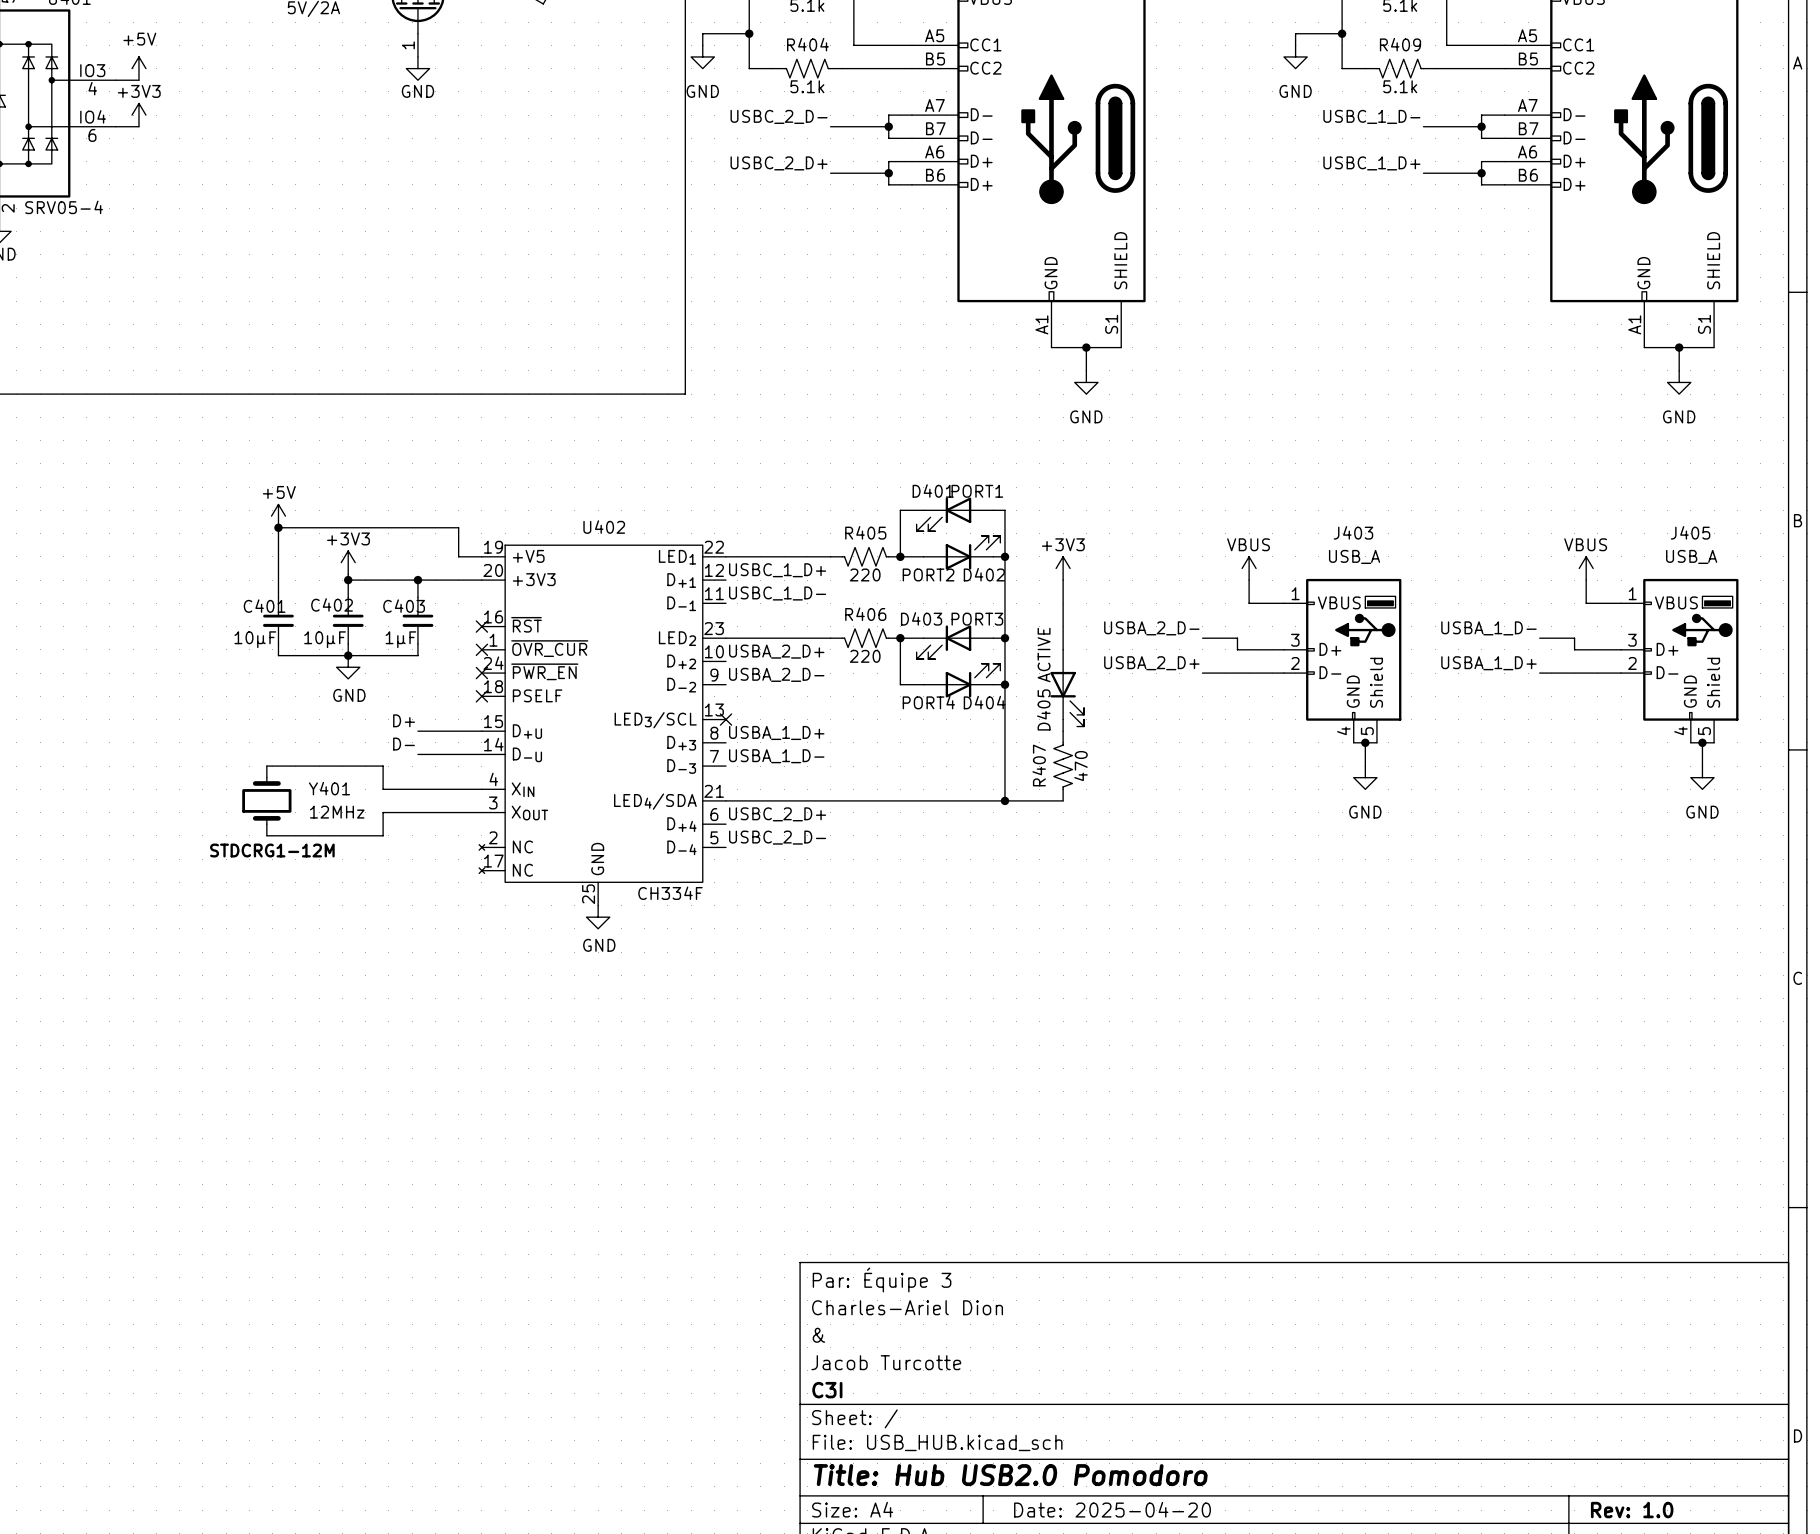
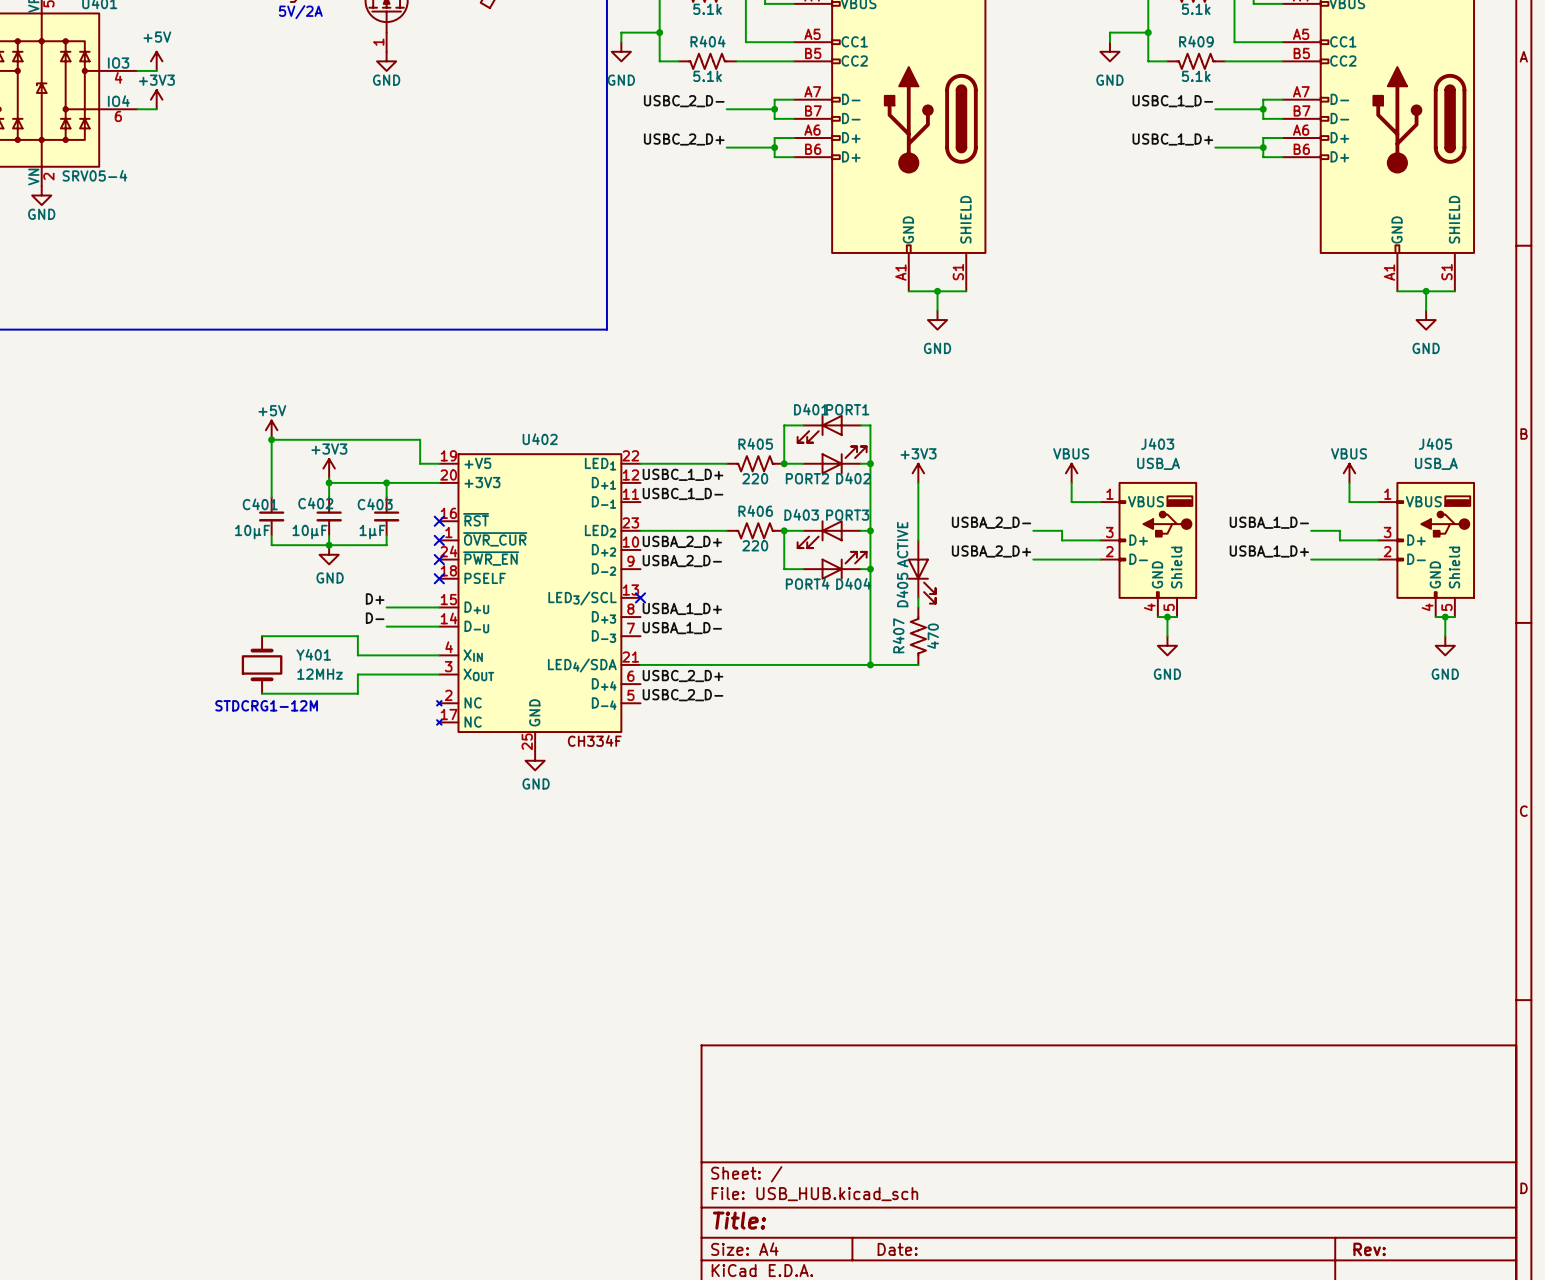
title block: Par: Équipe 3 (882, 1279) -> none
title block: Charles-Ariel Dion (907, 1307) -> none
title block: & (818, 1335) -> none
title block: Jacob Turcotte (886, 1362) -> none
title block: C3I (827, 1390) -> none
title block: Title: Hub USB2.0 Pomodoro (1010, 1475) -> Title: (739, 1220)
title block: Date: 2025-04-20 (1112, 1509) -> Date: (897, 1249)
title block: Rev: 1.0 (1632, 1510) -> Rev: (1369, 1249)

